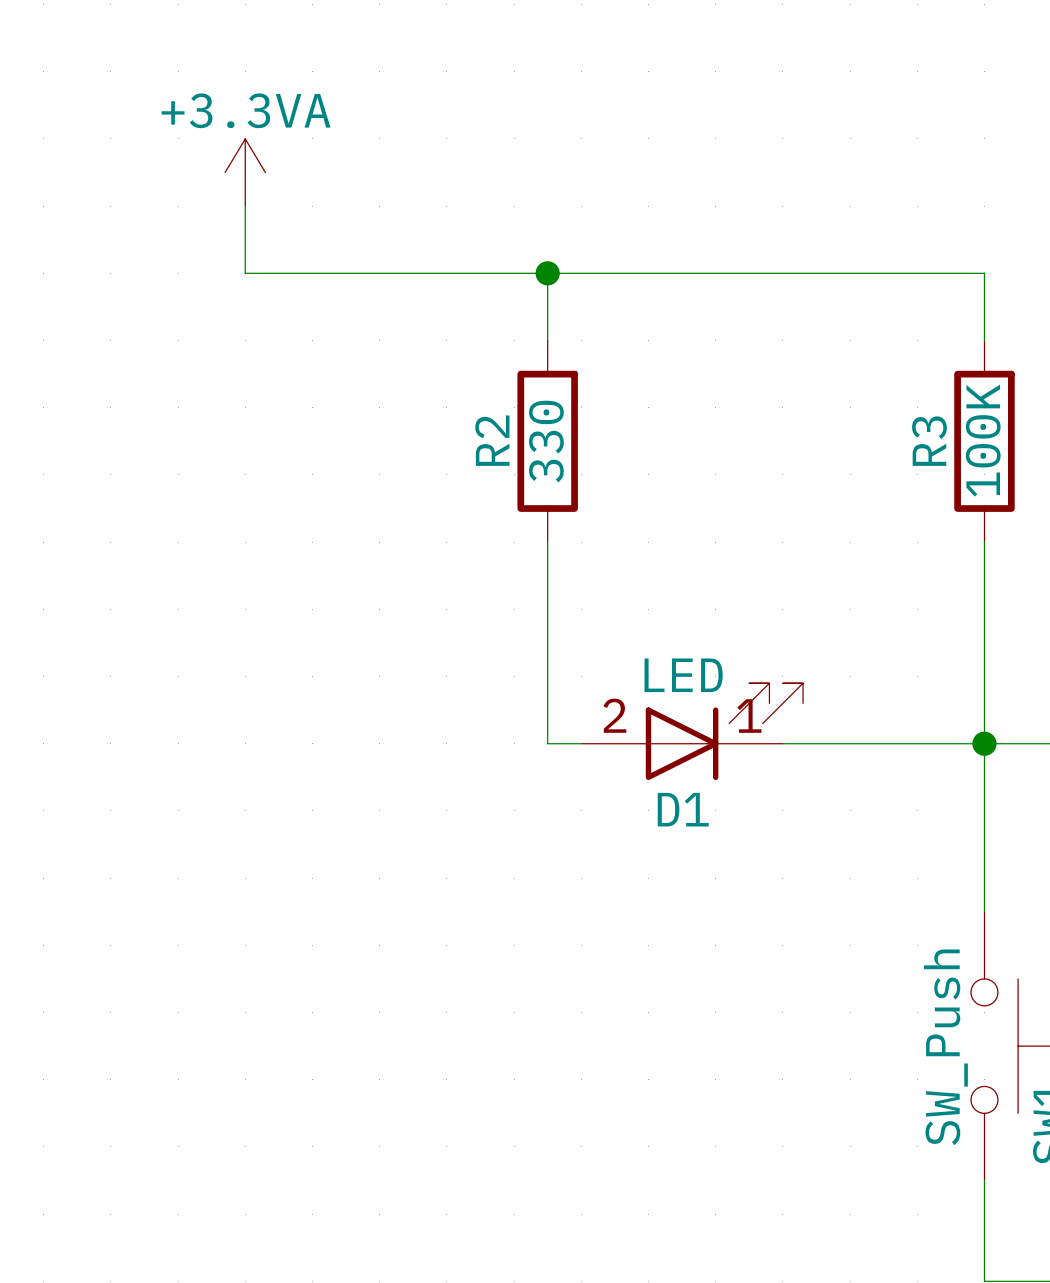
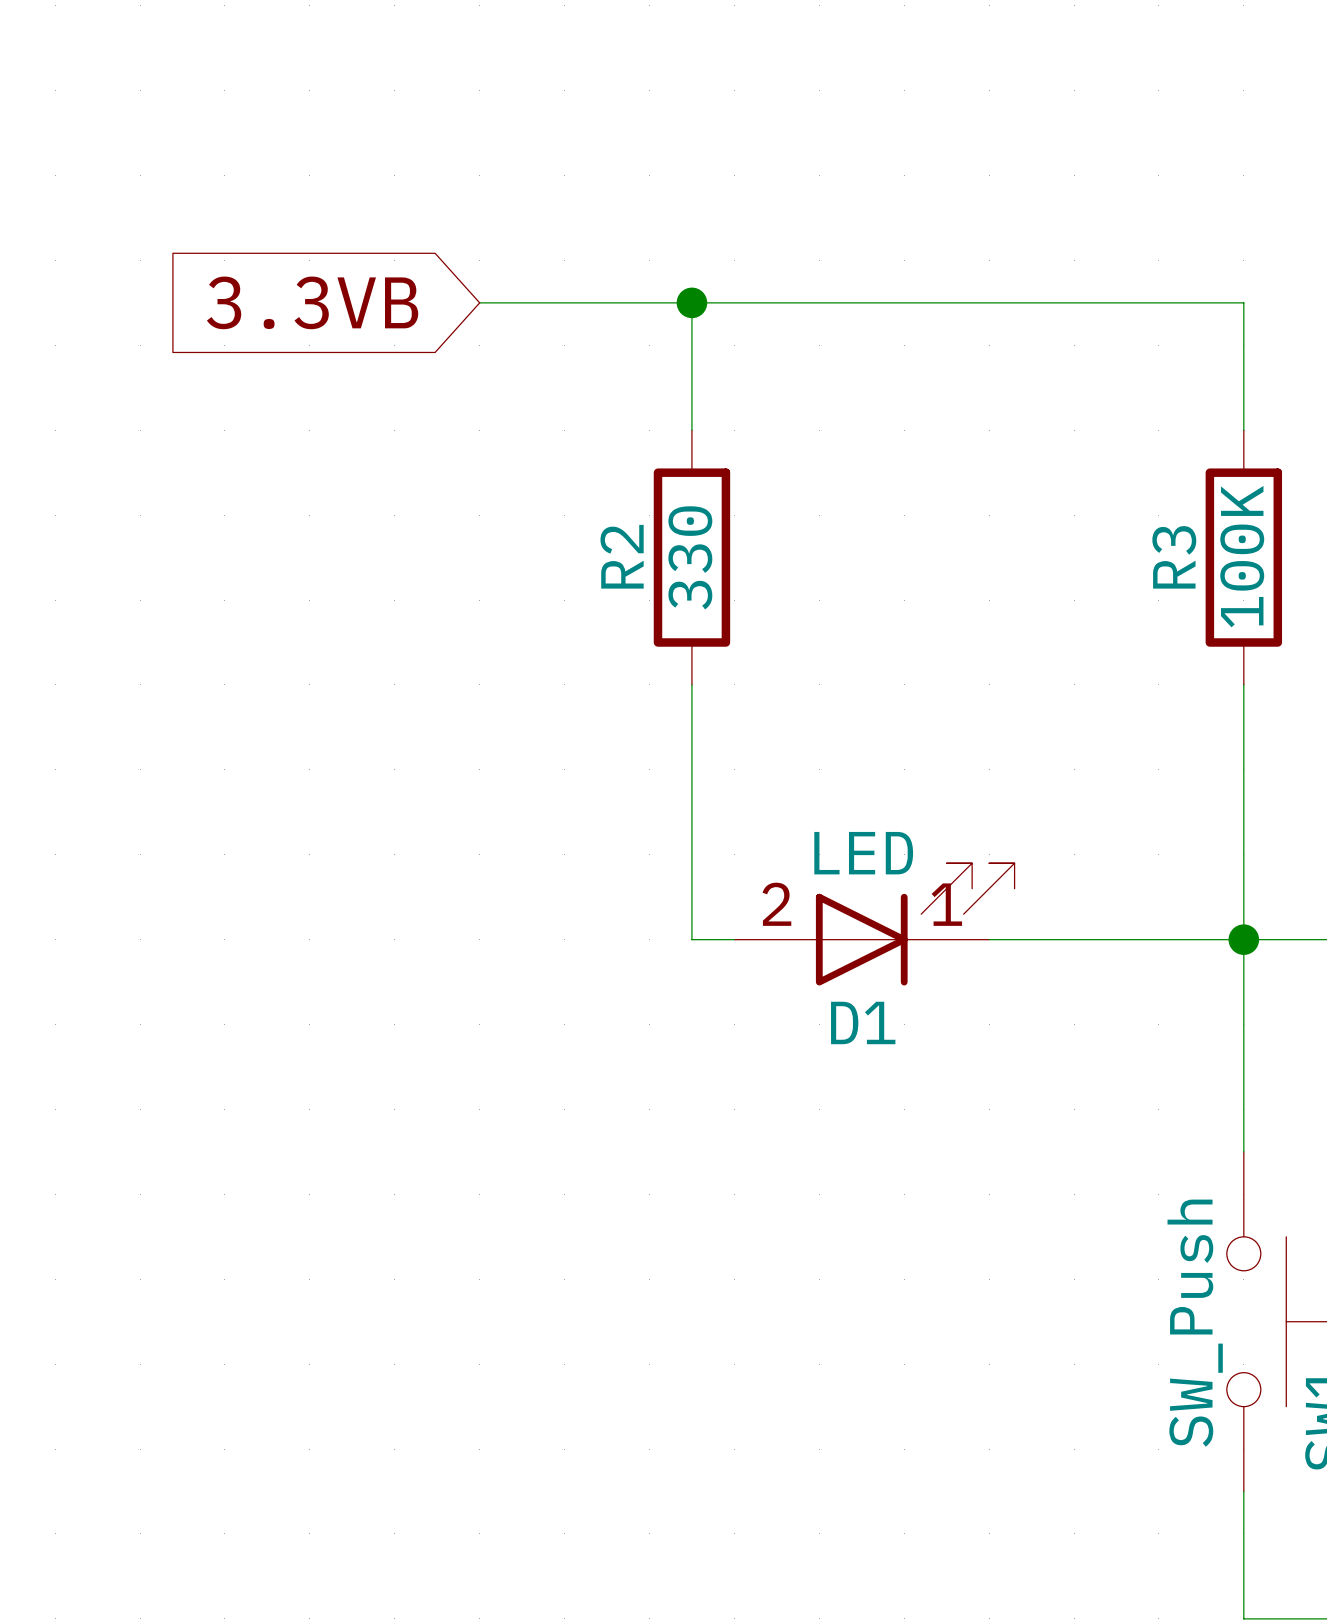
power symbol: +3.3VA (245, 172) -> none
wire: (245, 206) (245, 273) (984, 273) -> (479, 302) (1243, 302) (1243, 345)
global label: none -> 3.3VB (312, 302)
wire: none -> (691, 302) (691, 345)
junction position: (547, 273) -> (691, 302)

